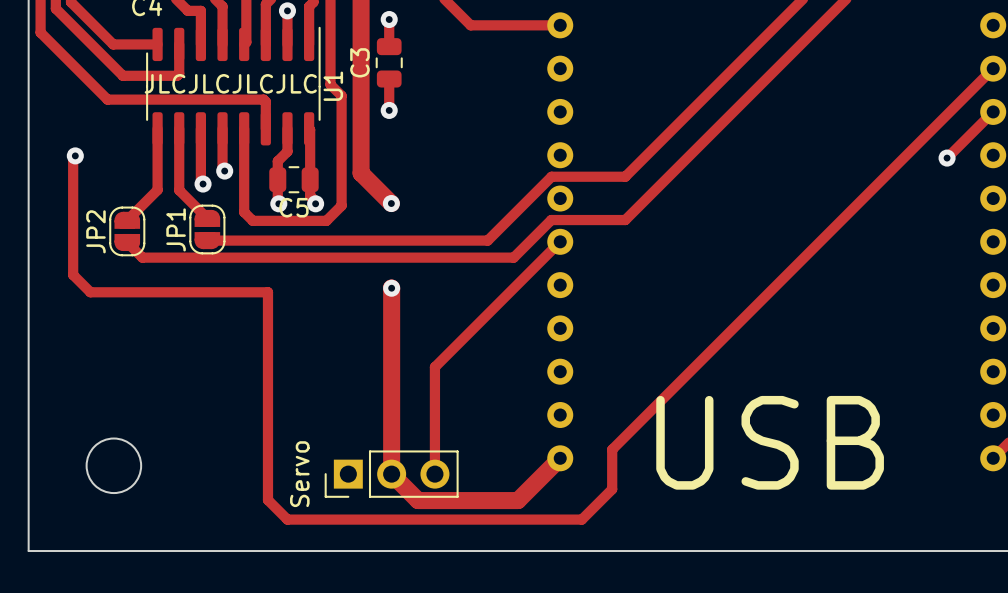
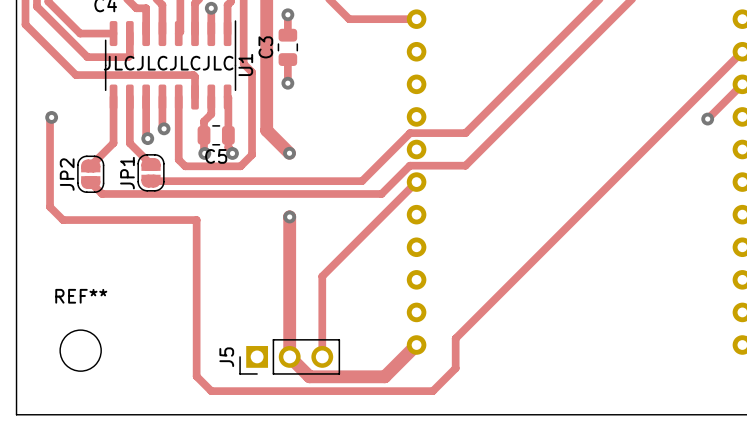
REF** name: none -> REF** (81, 296)
text: USB (770, 442) -> none
Servo name: Servo (299, 474) -> J5 (226, 357)

